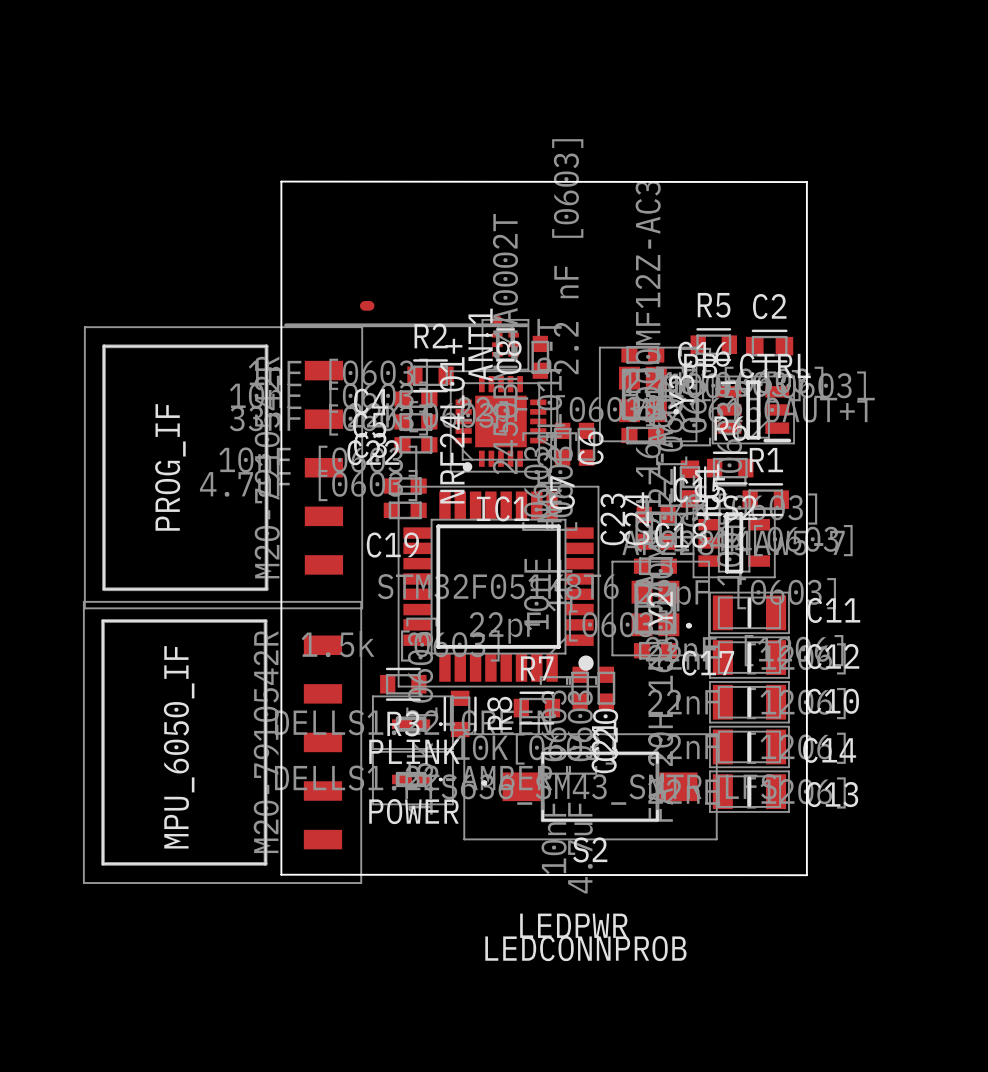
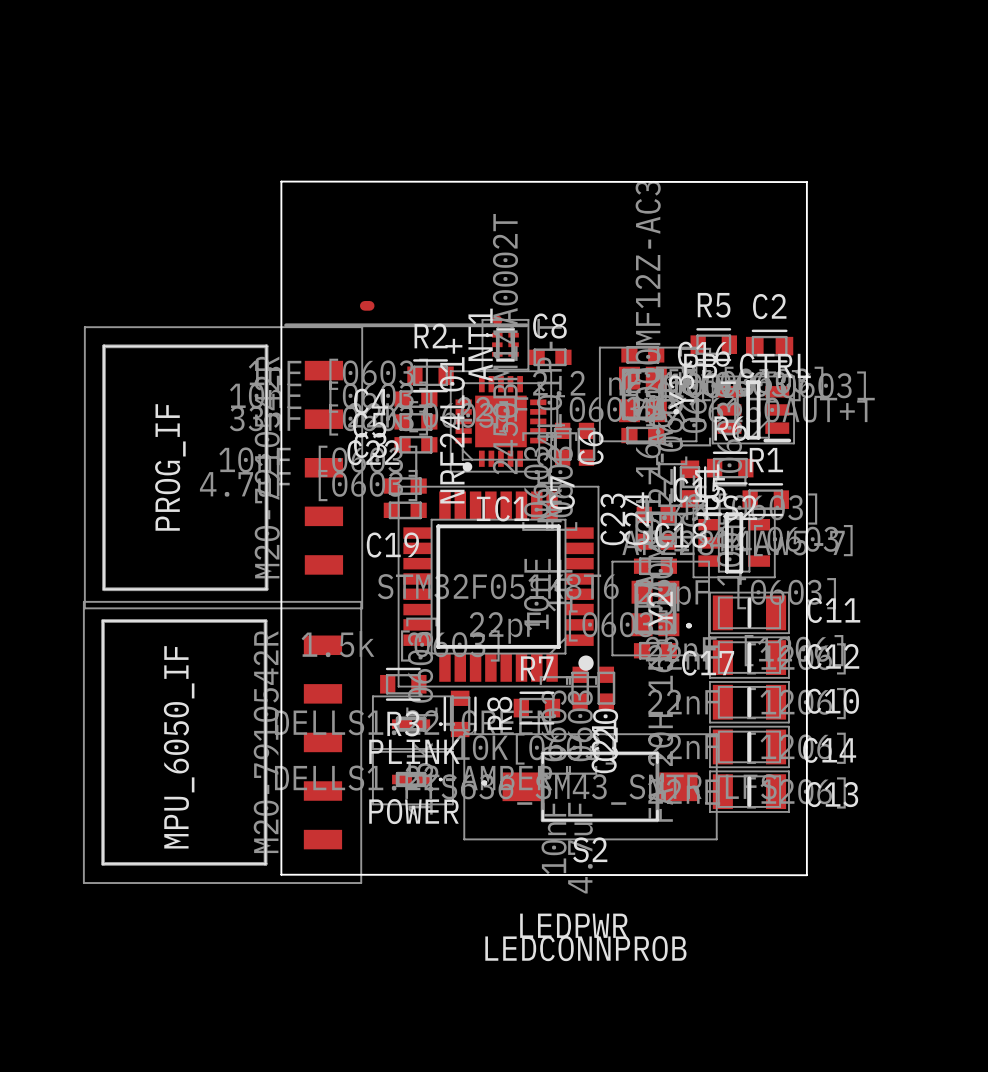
C8 rotation: 0° (540, 357) -> 90° clockwise (550, 357)

